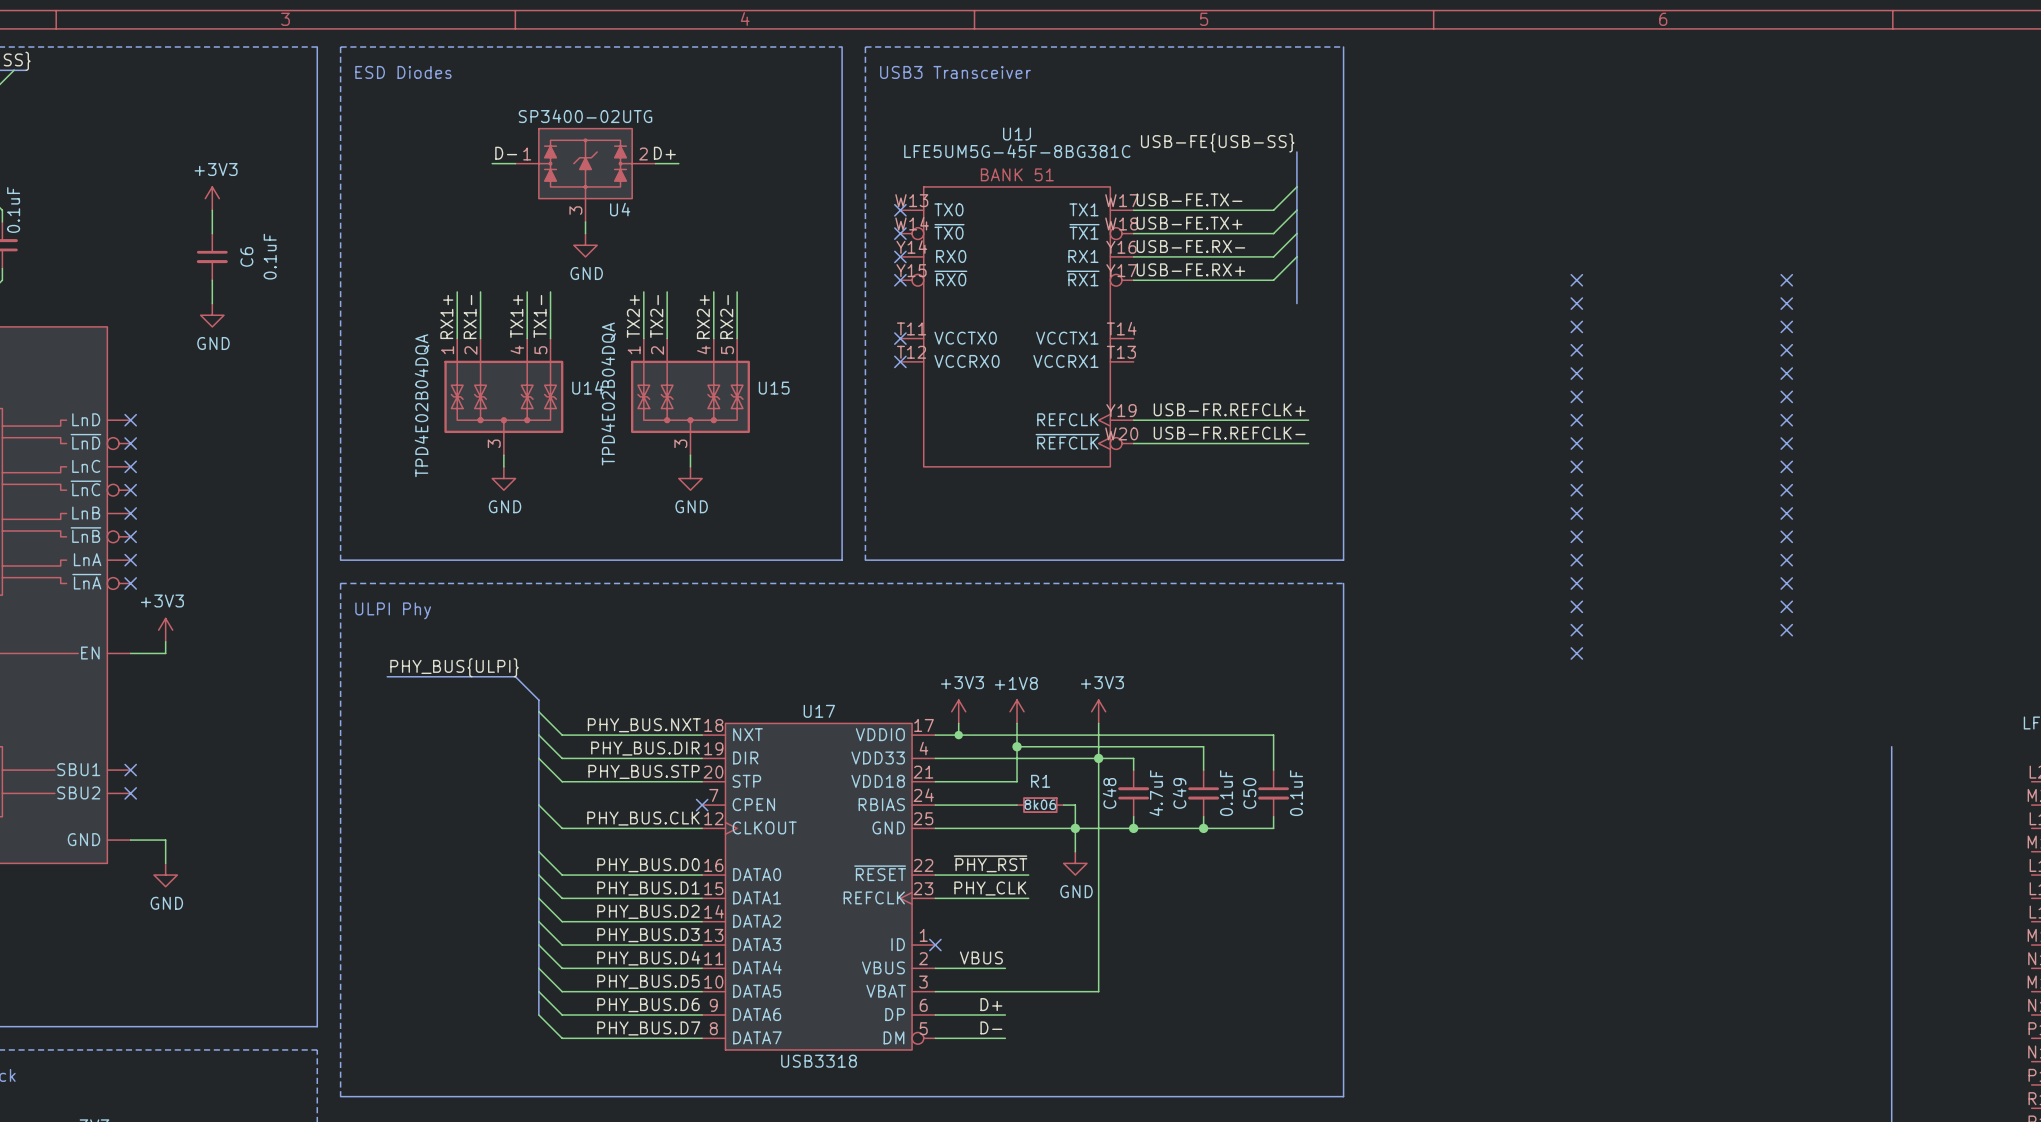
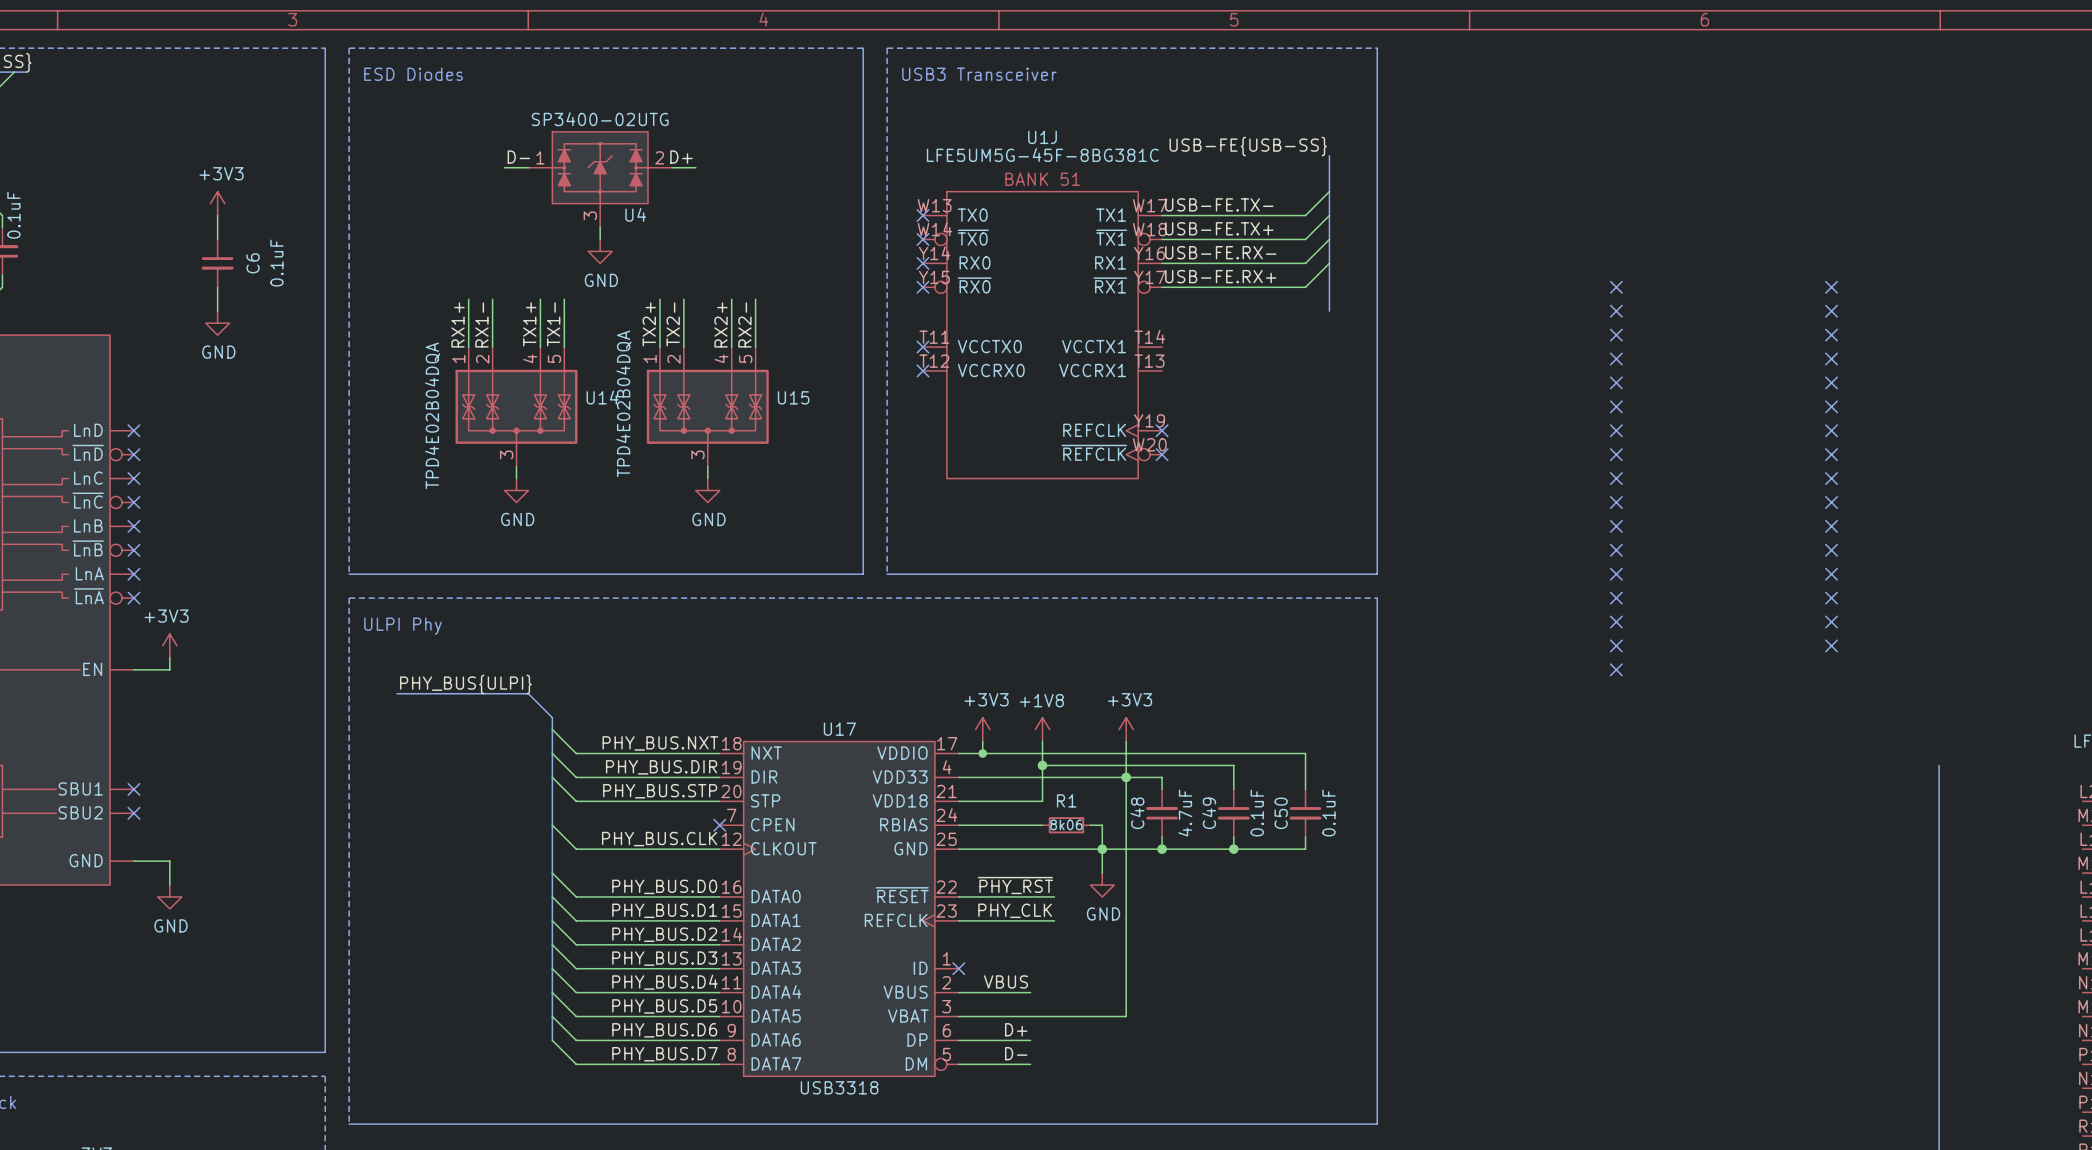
label: USB-FR.REFCLK+ (1229, 409) -> none
wire: (1133, 420) (1308, 420) -> none
no-connect mark: none -> (1162, 430)
label: USB-FR.REFCLK- (1229, 433) -> none
wire: (1133, 443) (1308, 443) -> none
no-connect mark: none -> (1162, 454)

